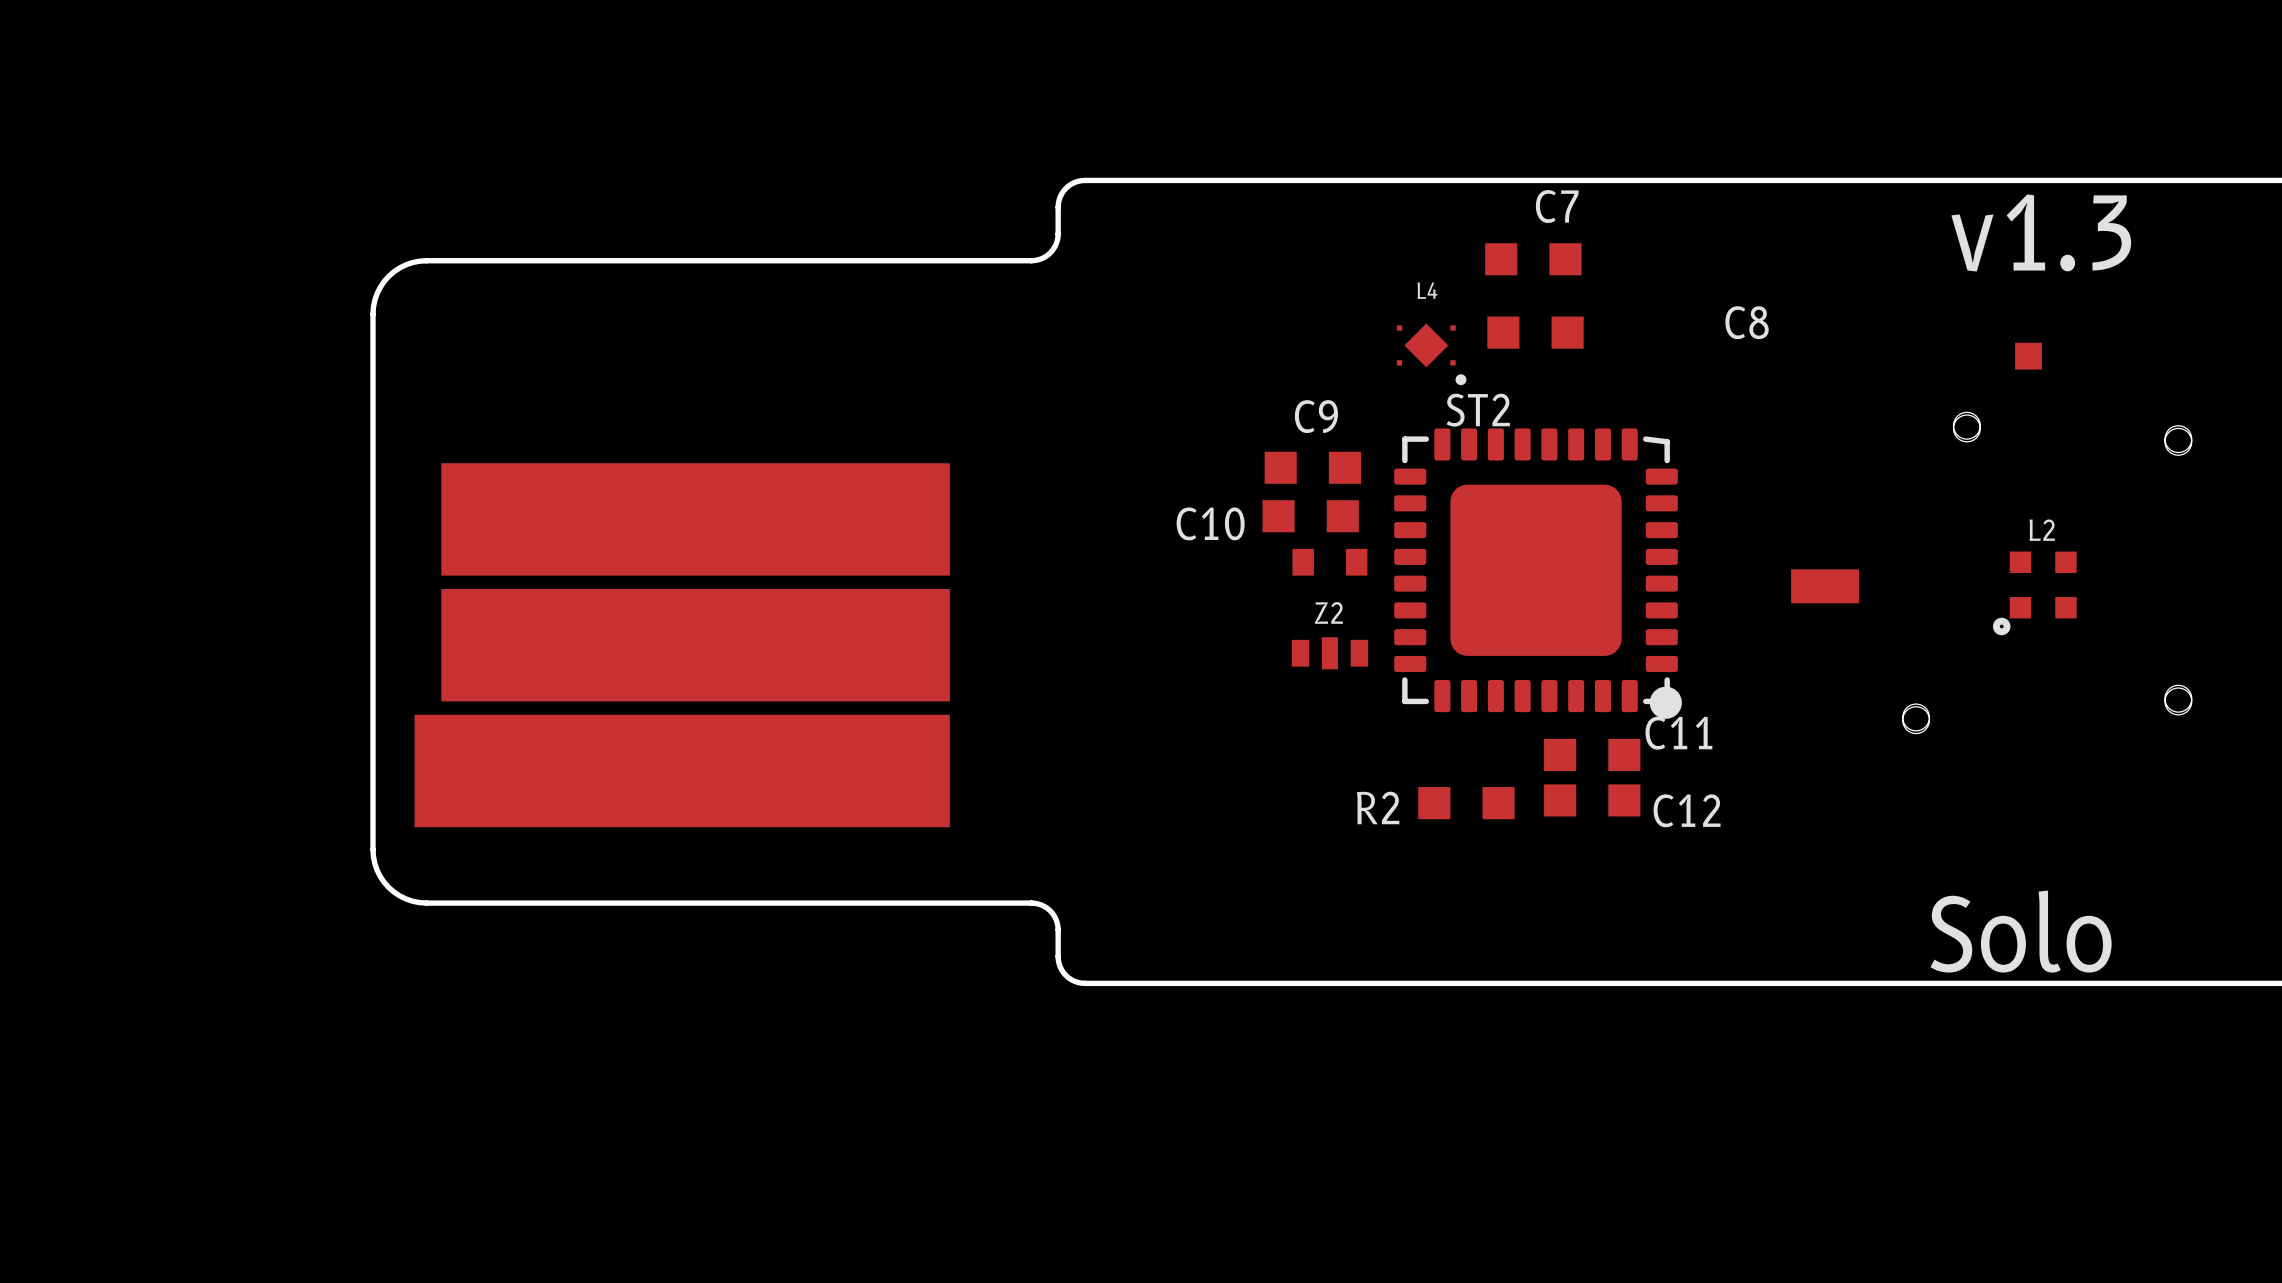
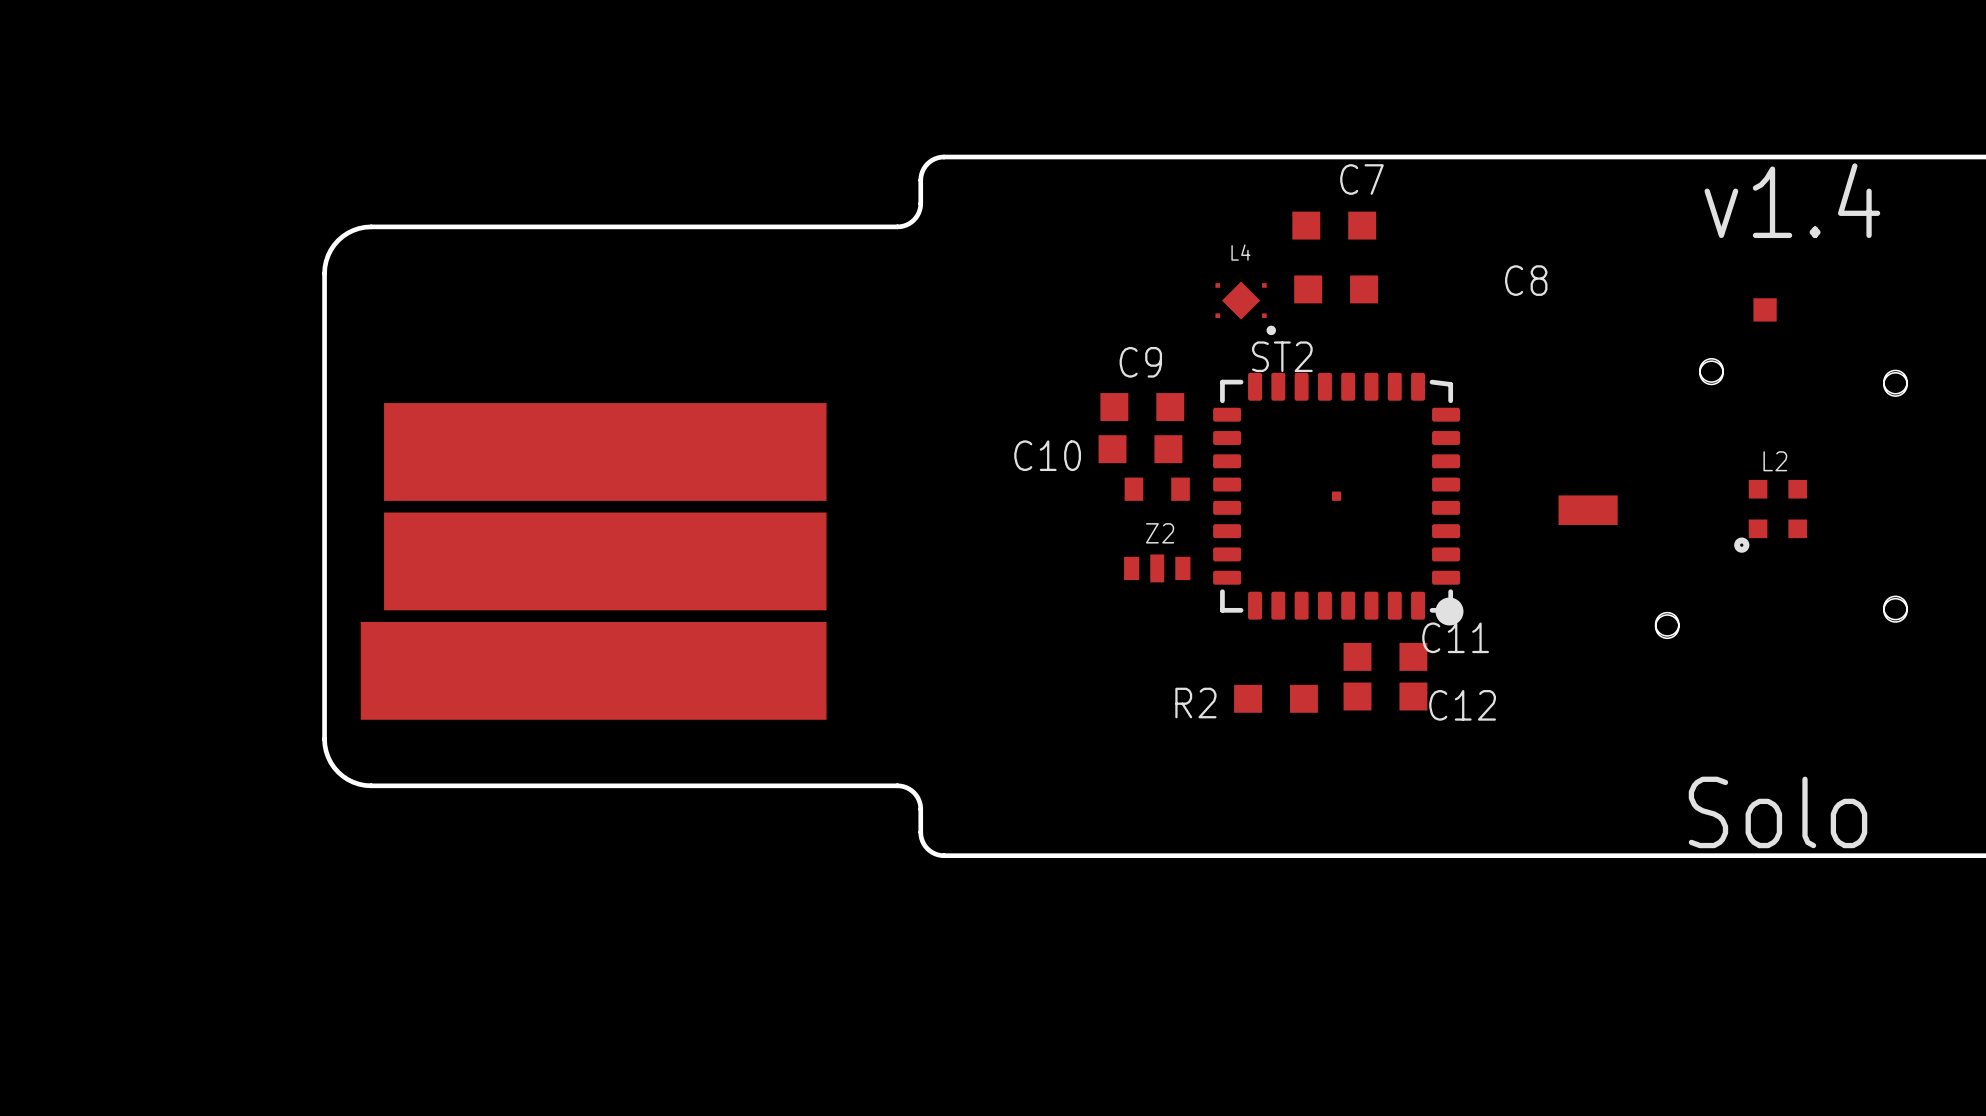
text: v1.3 (2041, 232) -> v1.4 (1792, 200)
ST2 footprint: [1394, 428, 1682, 719] -> [1213, 372, 1464, 626]

